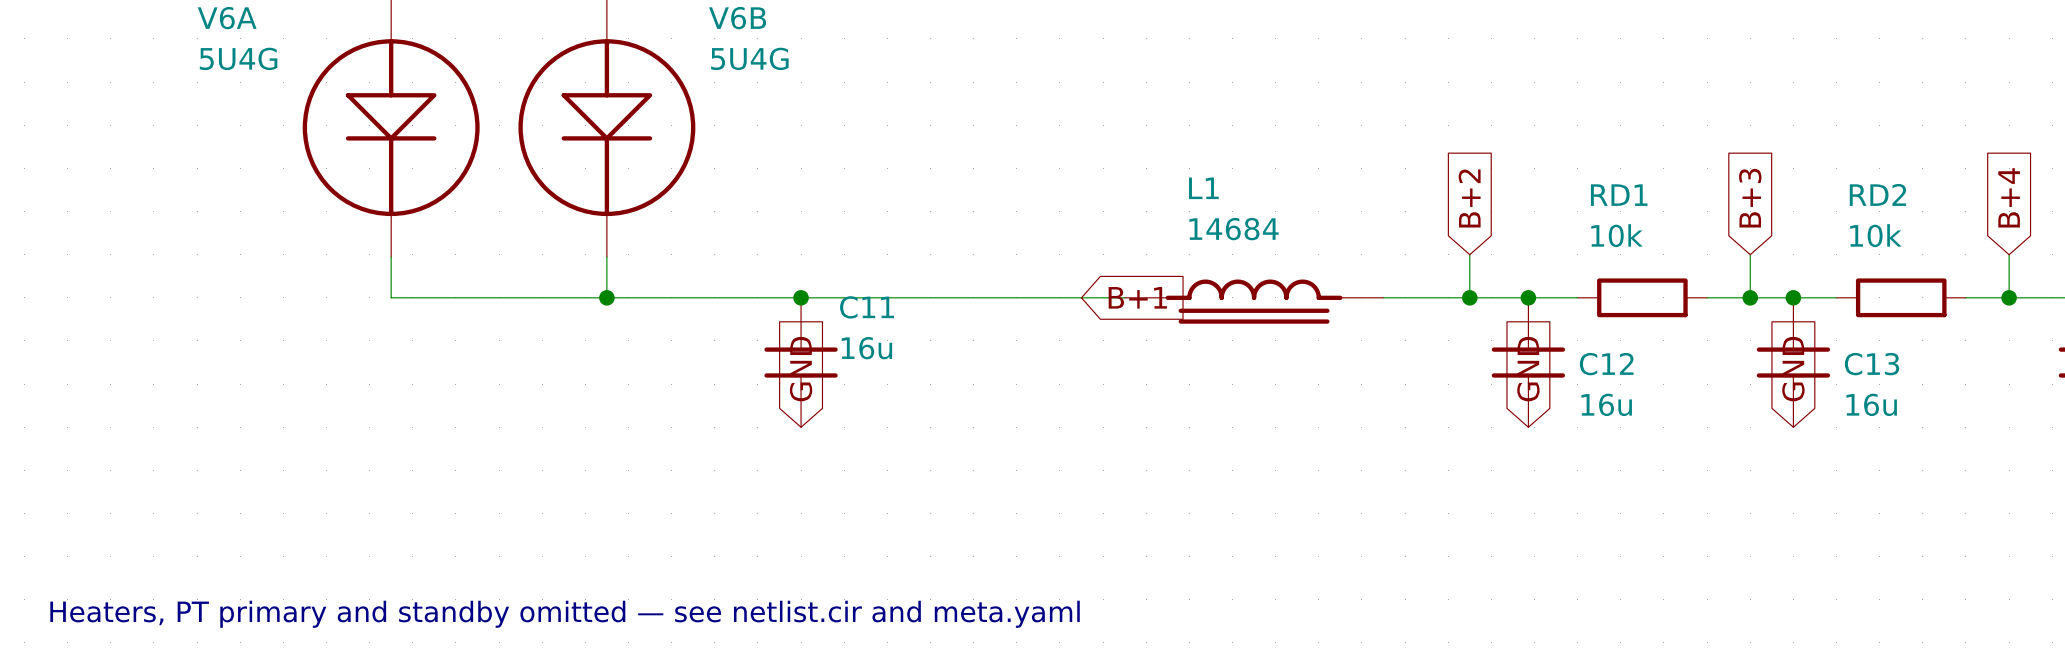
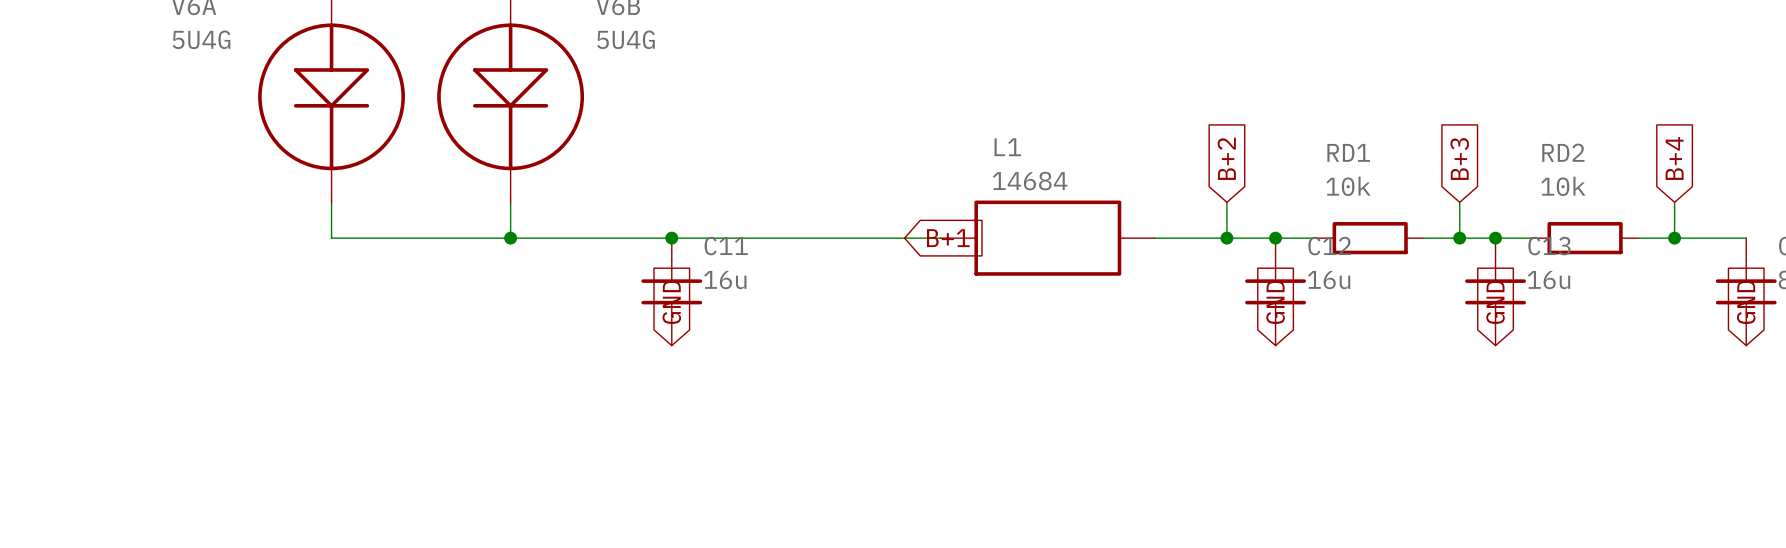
L1 symbol: [1124, 279, 1384, 324] -> [940, 200, 1156, 276]
C12 name position: C12 (1606, 364) -> C12 (1329, 246)
C13 name position: C13 (1871, 364) -> C13 (1549, 246)
C12 value position: 16u (1606, 404) -> 16u (1329, 280)
C13 value position: 16u (1871, 404) -> 16u (1549, 280)
text: Heaters, PT primary and standby omitted — see netlist.cir and meta.yaml (565, 614) -> none

